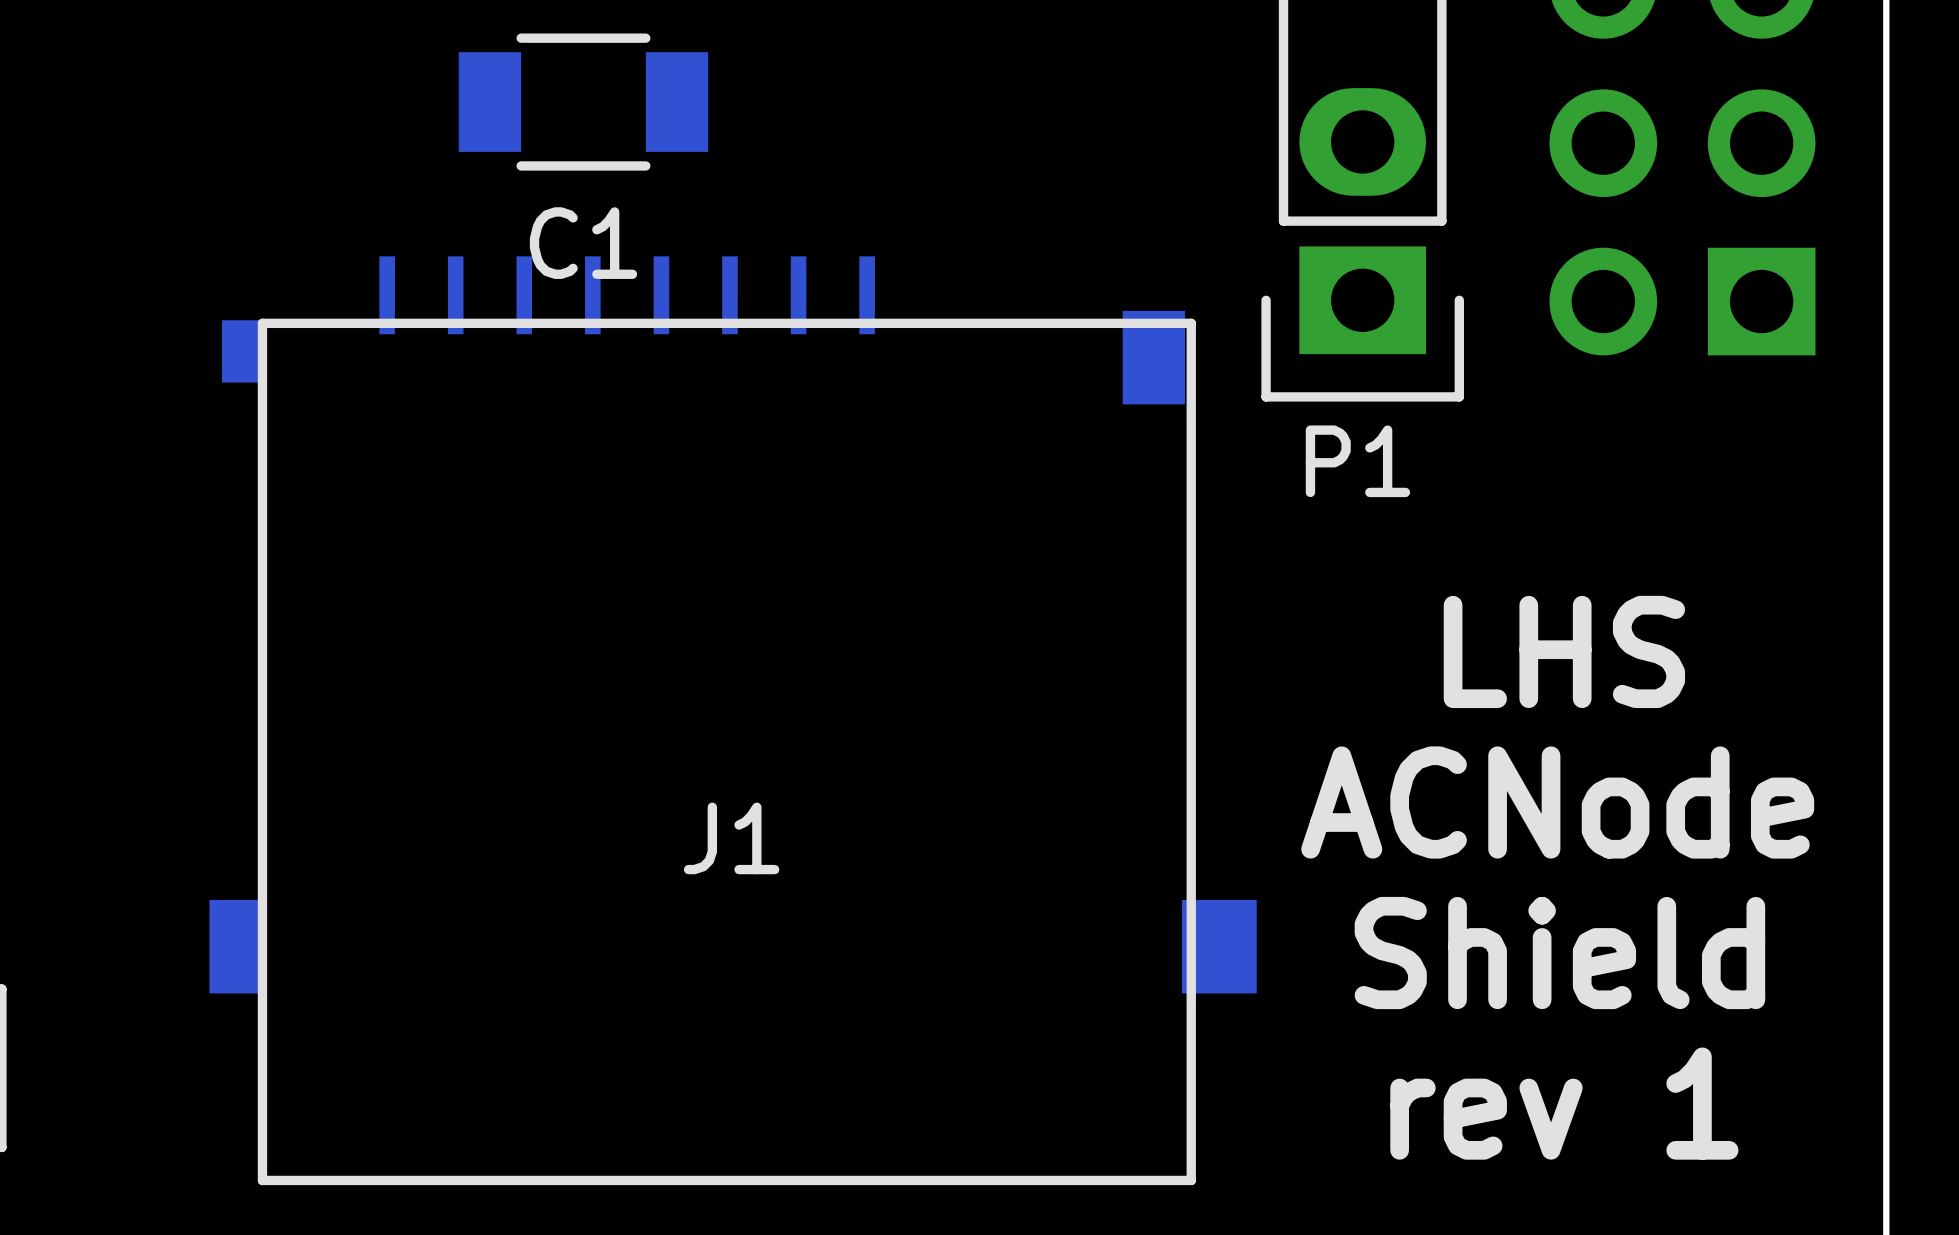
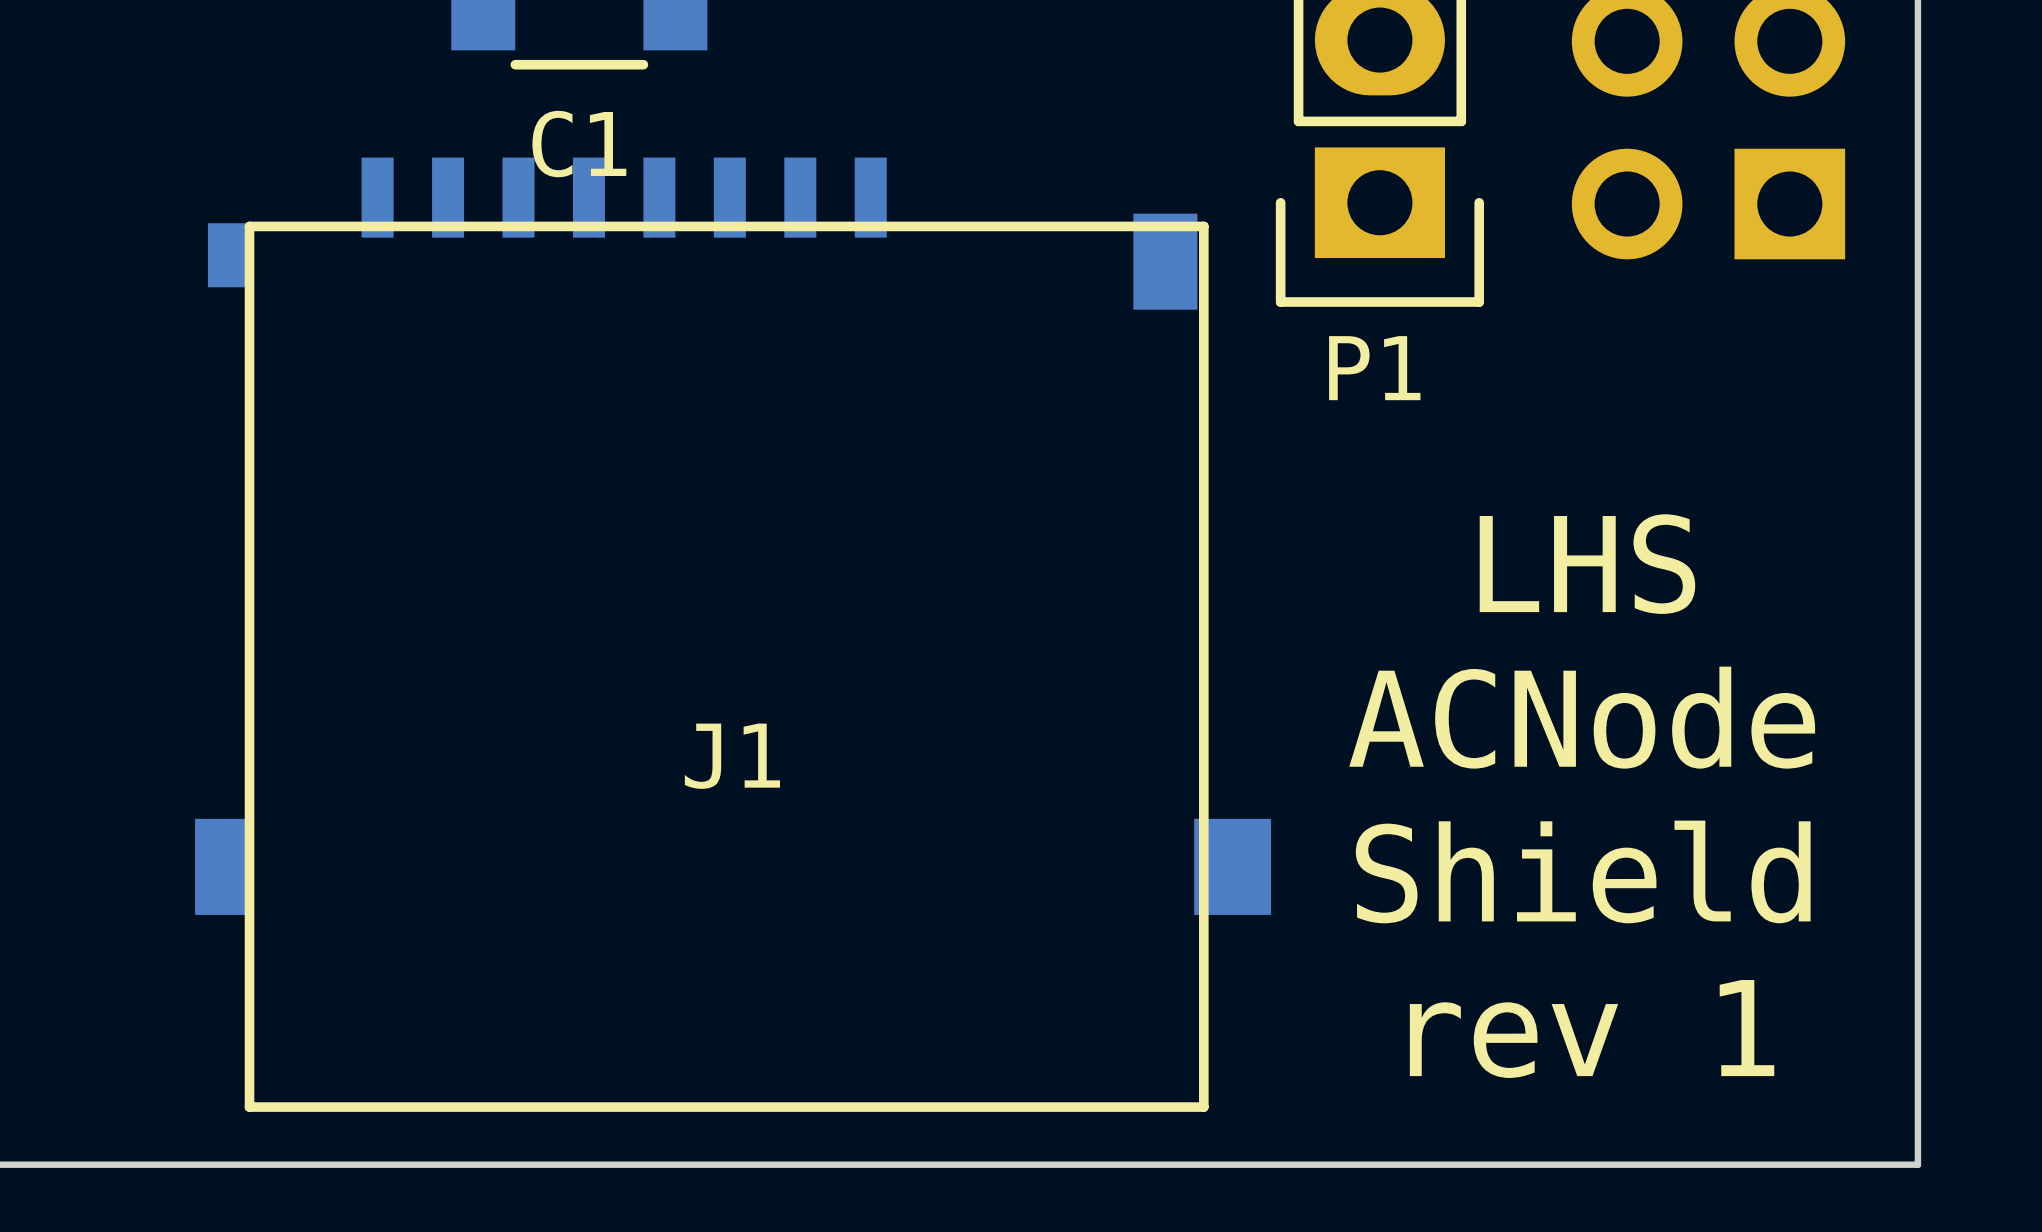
J1 footprint: [209, 256, 1257, 1186] -> [195, 157, 1272, 1112]

